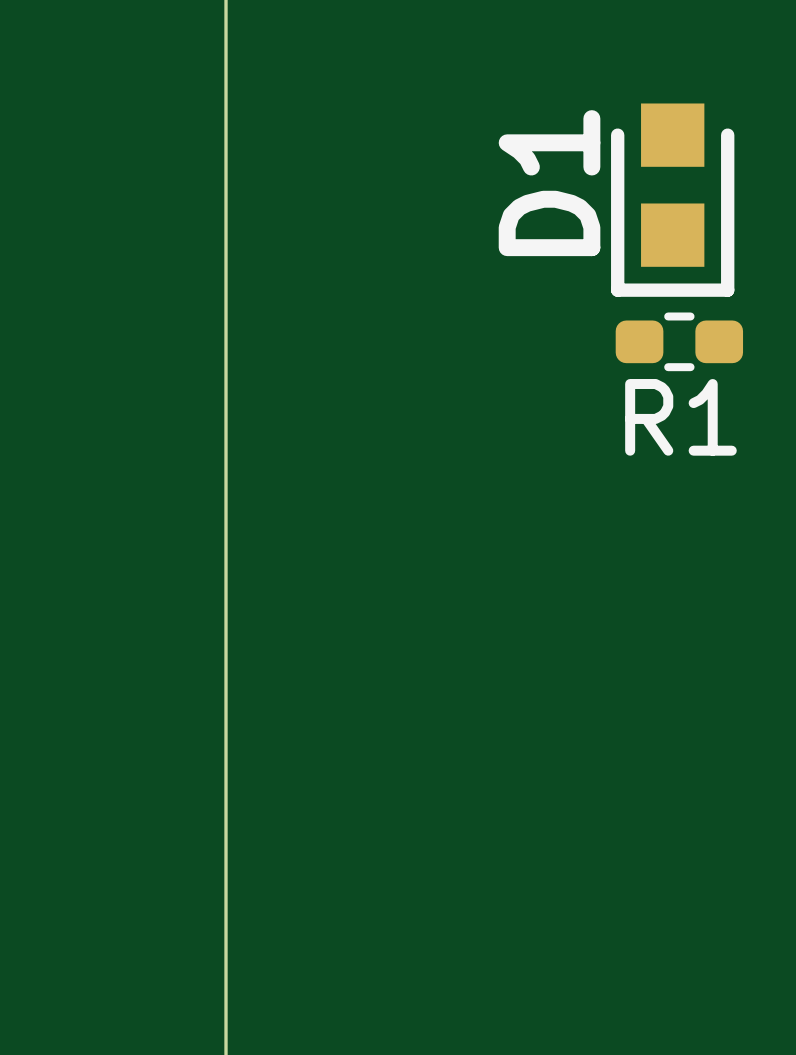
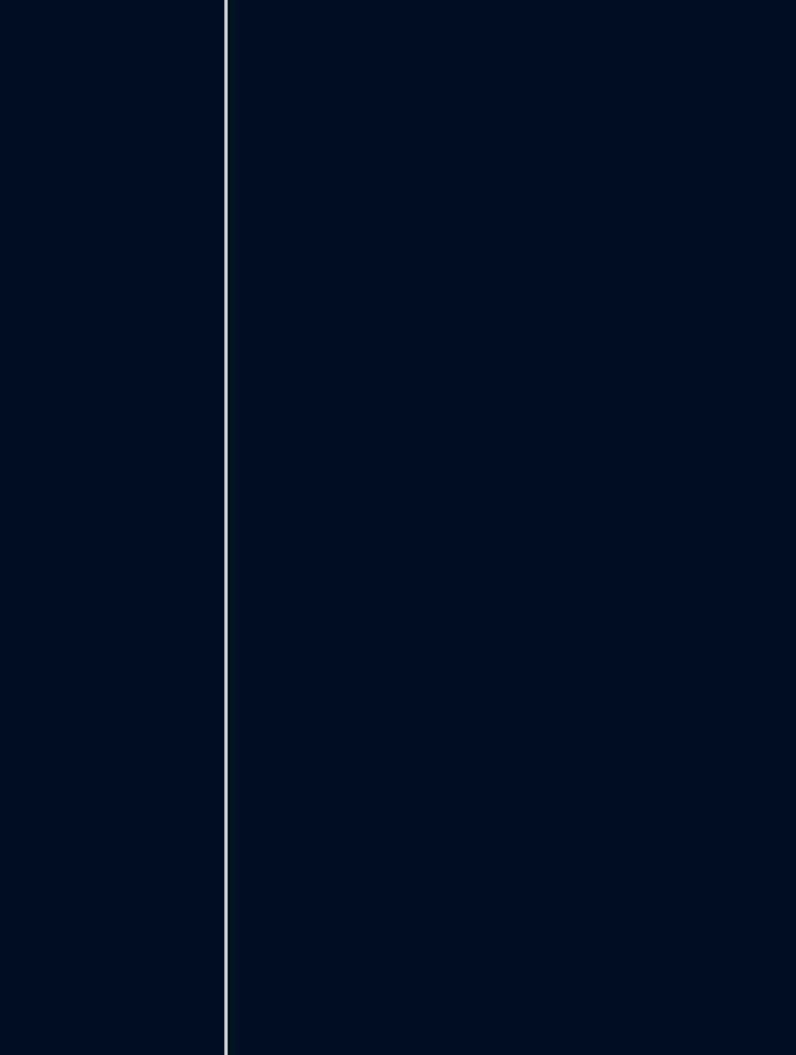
D1: (672, 200) -> none
R1: (679, 341) -> none

